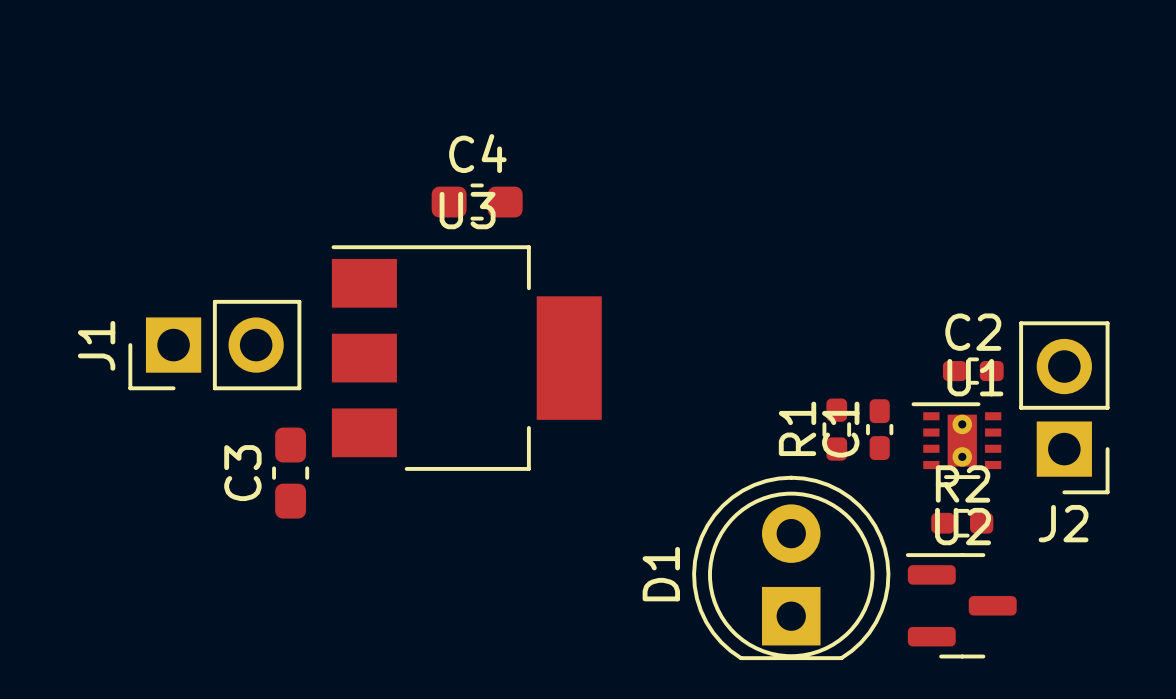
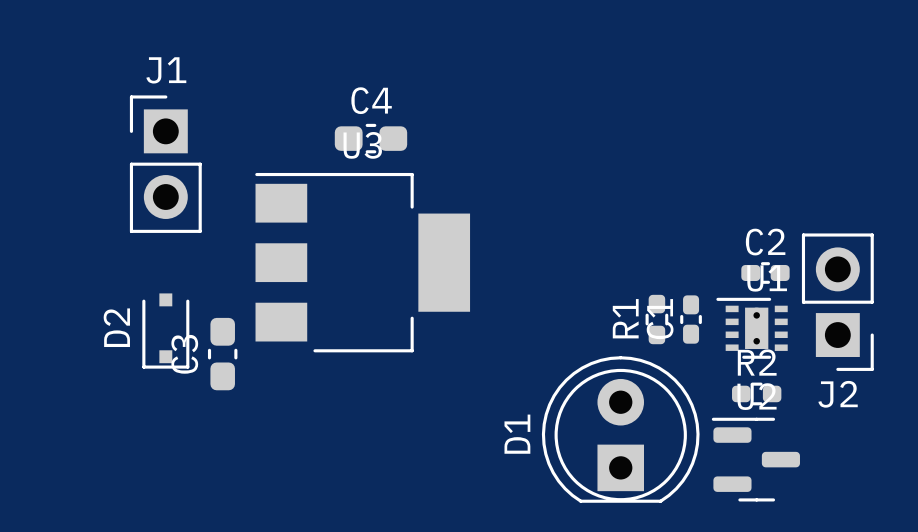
J1 rotation: 0° (214, 345) -> 90° clockwise (165, 164)
J1 position: (214, 345) -> (165, 164)
D2: none -> (165, 331)

